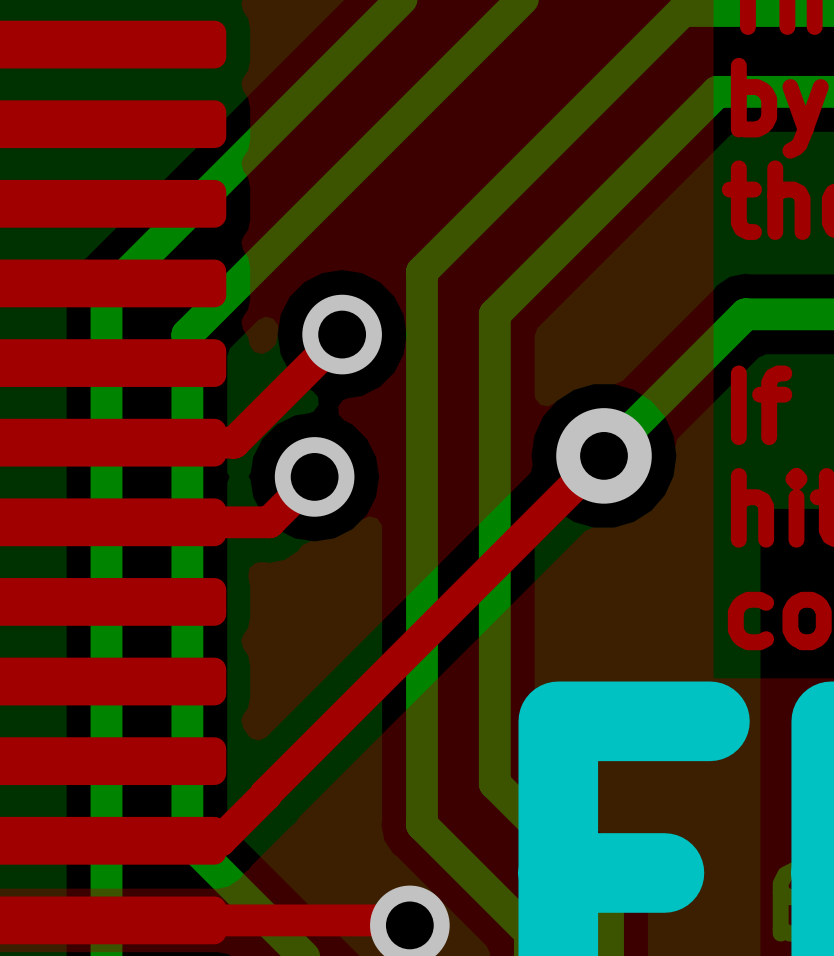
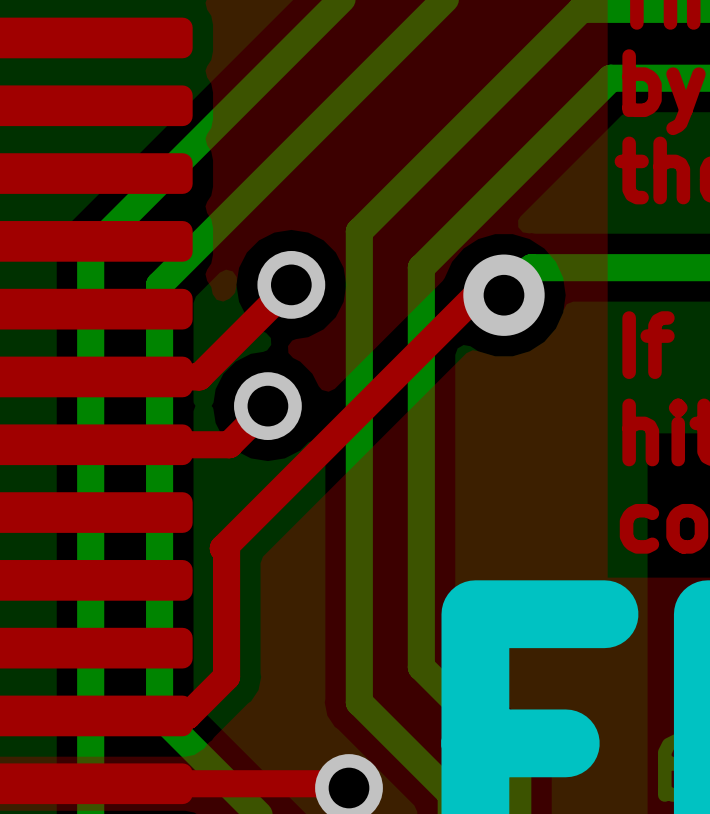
bottom track: (745, 314) (603, 455) -> (634, 267) (531, 267) (503, 295)
top track: (603, 455) (266, 793) -> (503, 295) (476, 295) (223, 548) (226, 551) (226, 675)
via position: (603, 455) -> (503, 295)

